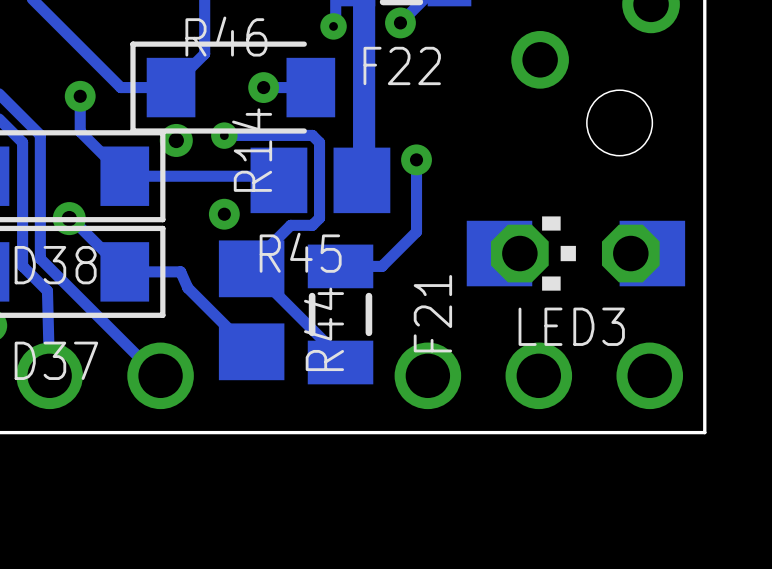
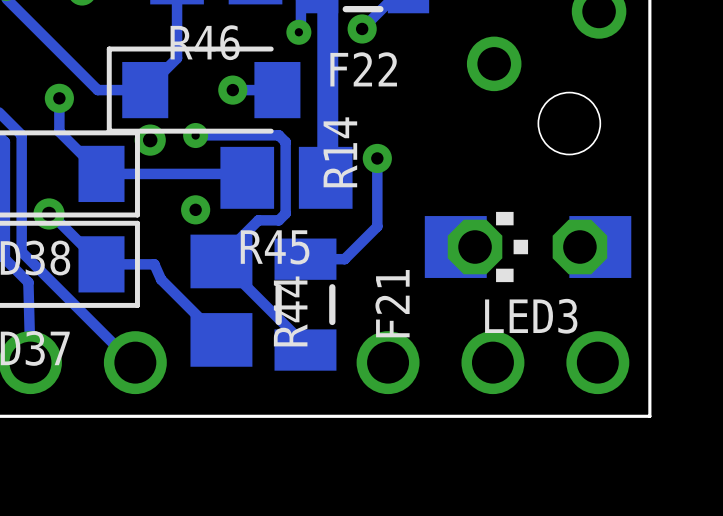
R14 position: (252, 150) -> (340, 152)

